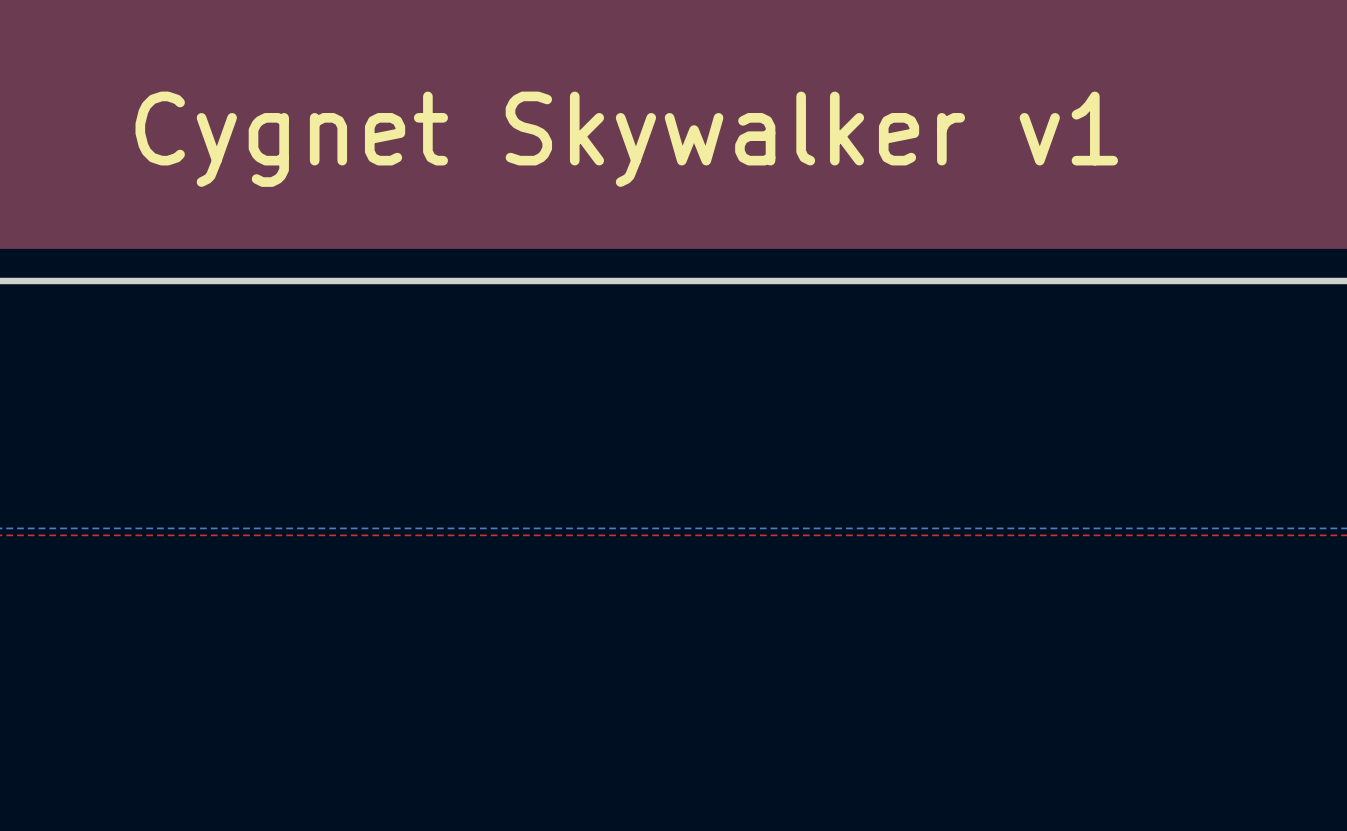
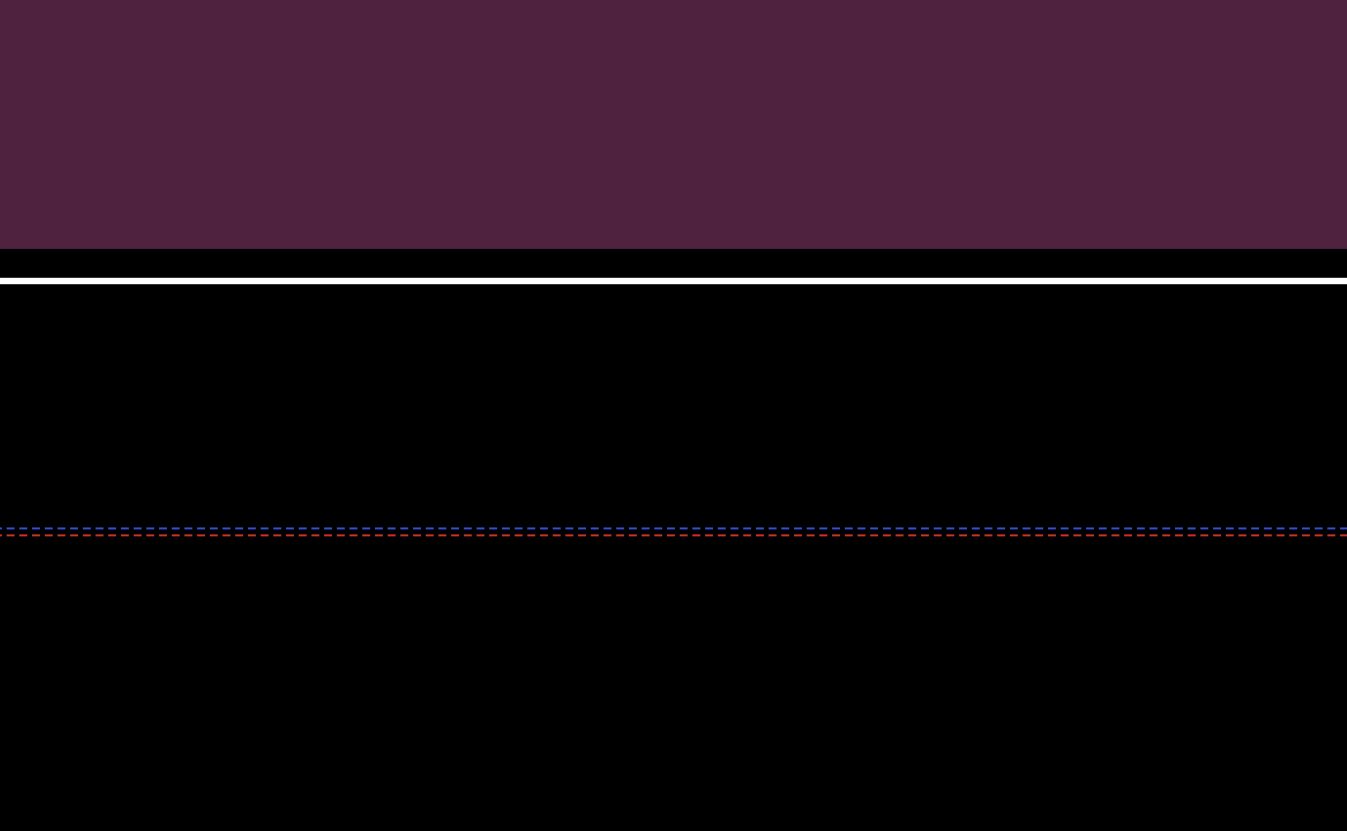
text: Cygnet Skywalker v1 (626, 139) -> none

